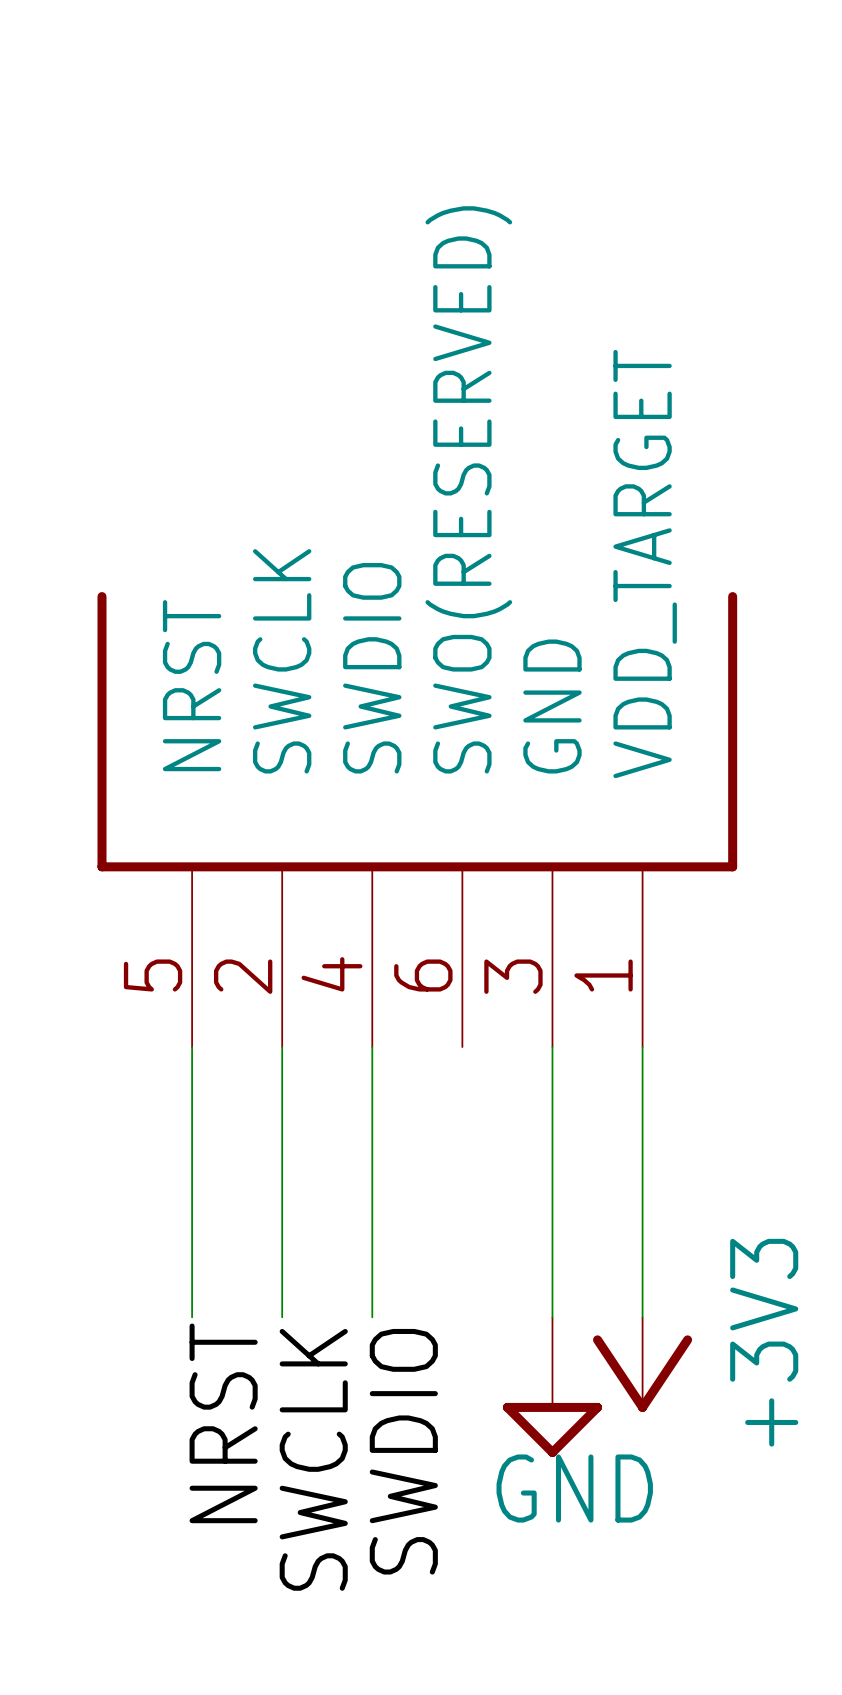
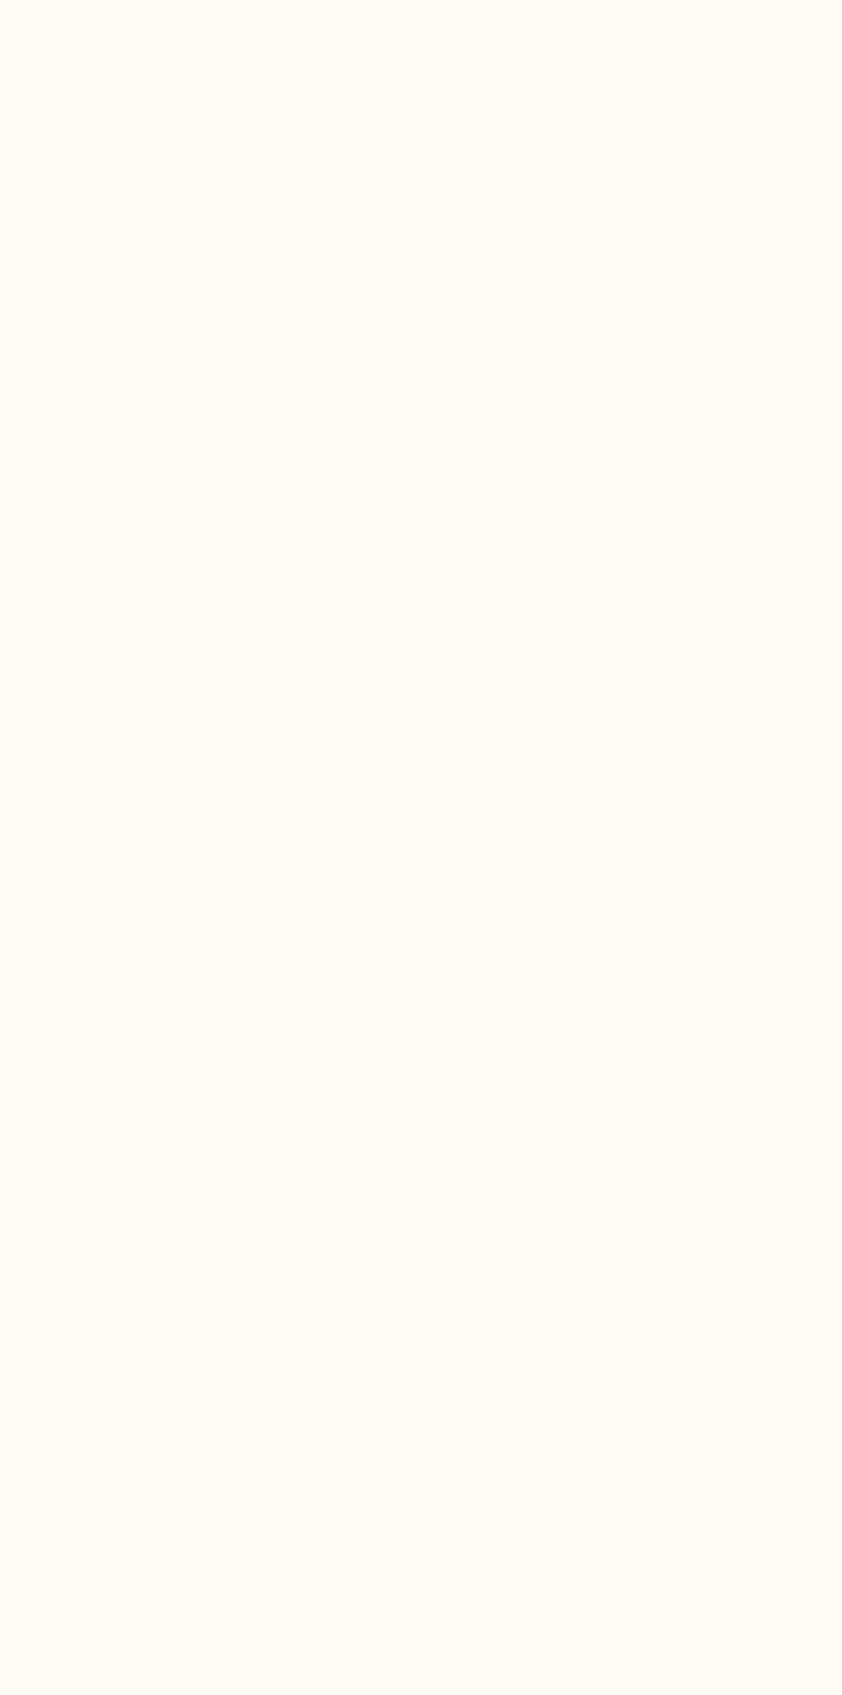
part: (417, 819) -> none
wire: (192, 1047) (192, 1317) -> none
wire: (282, 1047) (282, 1317) -> none
wire: (372, 1047) (372, 1317) -> none
wire: (552, 1047) (552, 1317) -> none
wire: (642, 1047) (642, 1317) -> none
power symbol: +3V3 (642, 1364) -> none
power symbol: GND (552, 1387) -> none
label: NRST (223, 1423) -> none
label: SWDIO (403, 1451) -> none
label: SWCLK (313, 1459) -> none

